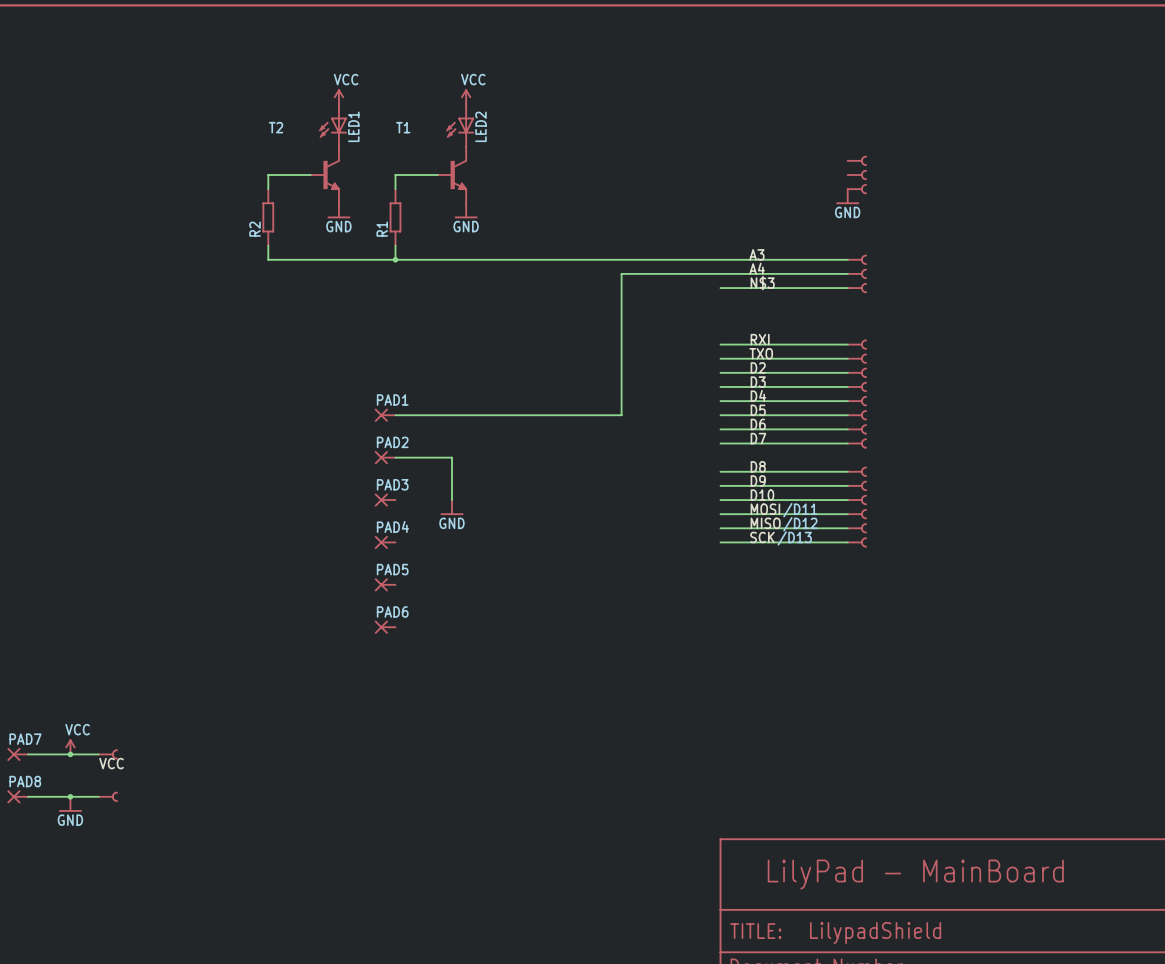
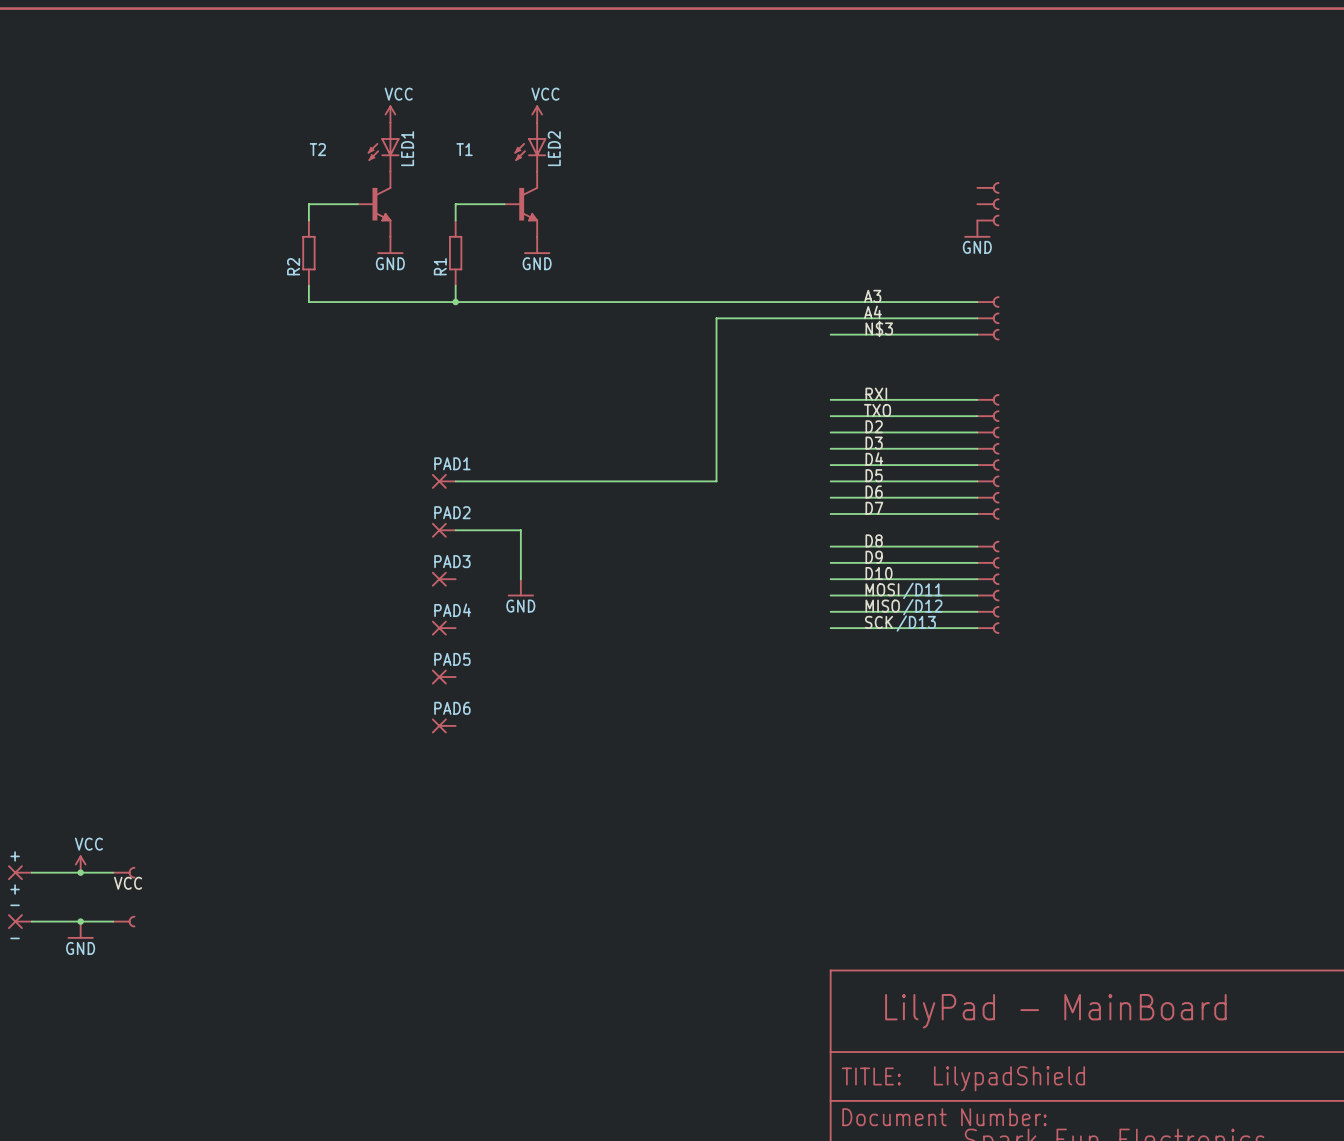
PAD7 name: PAD7 (25, 739) -> + (15, 856)
PAD7 value: none -> + (15, 889)
PAD8 name: PAD8 (25, 781) -> - (15, 905)
PAD8 value: none -> - (15, 938)

